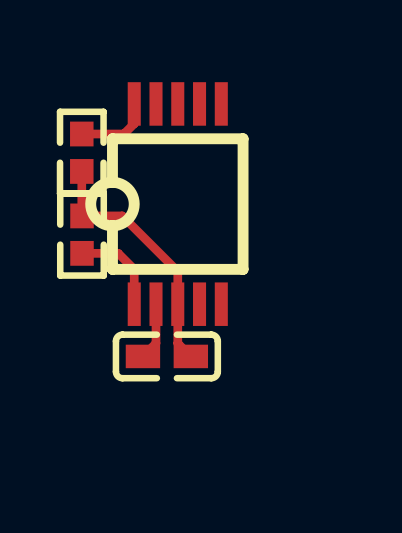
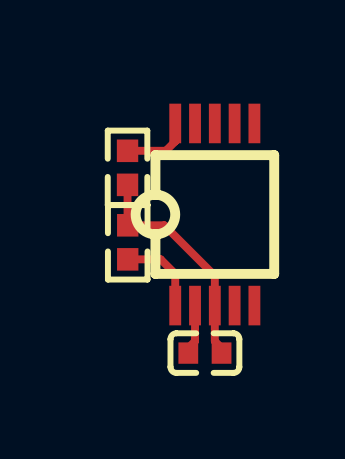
part footprint: [112, 331, 222, 382] -> [167, 330, 243, 376]

